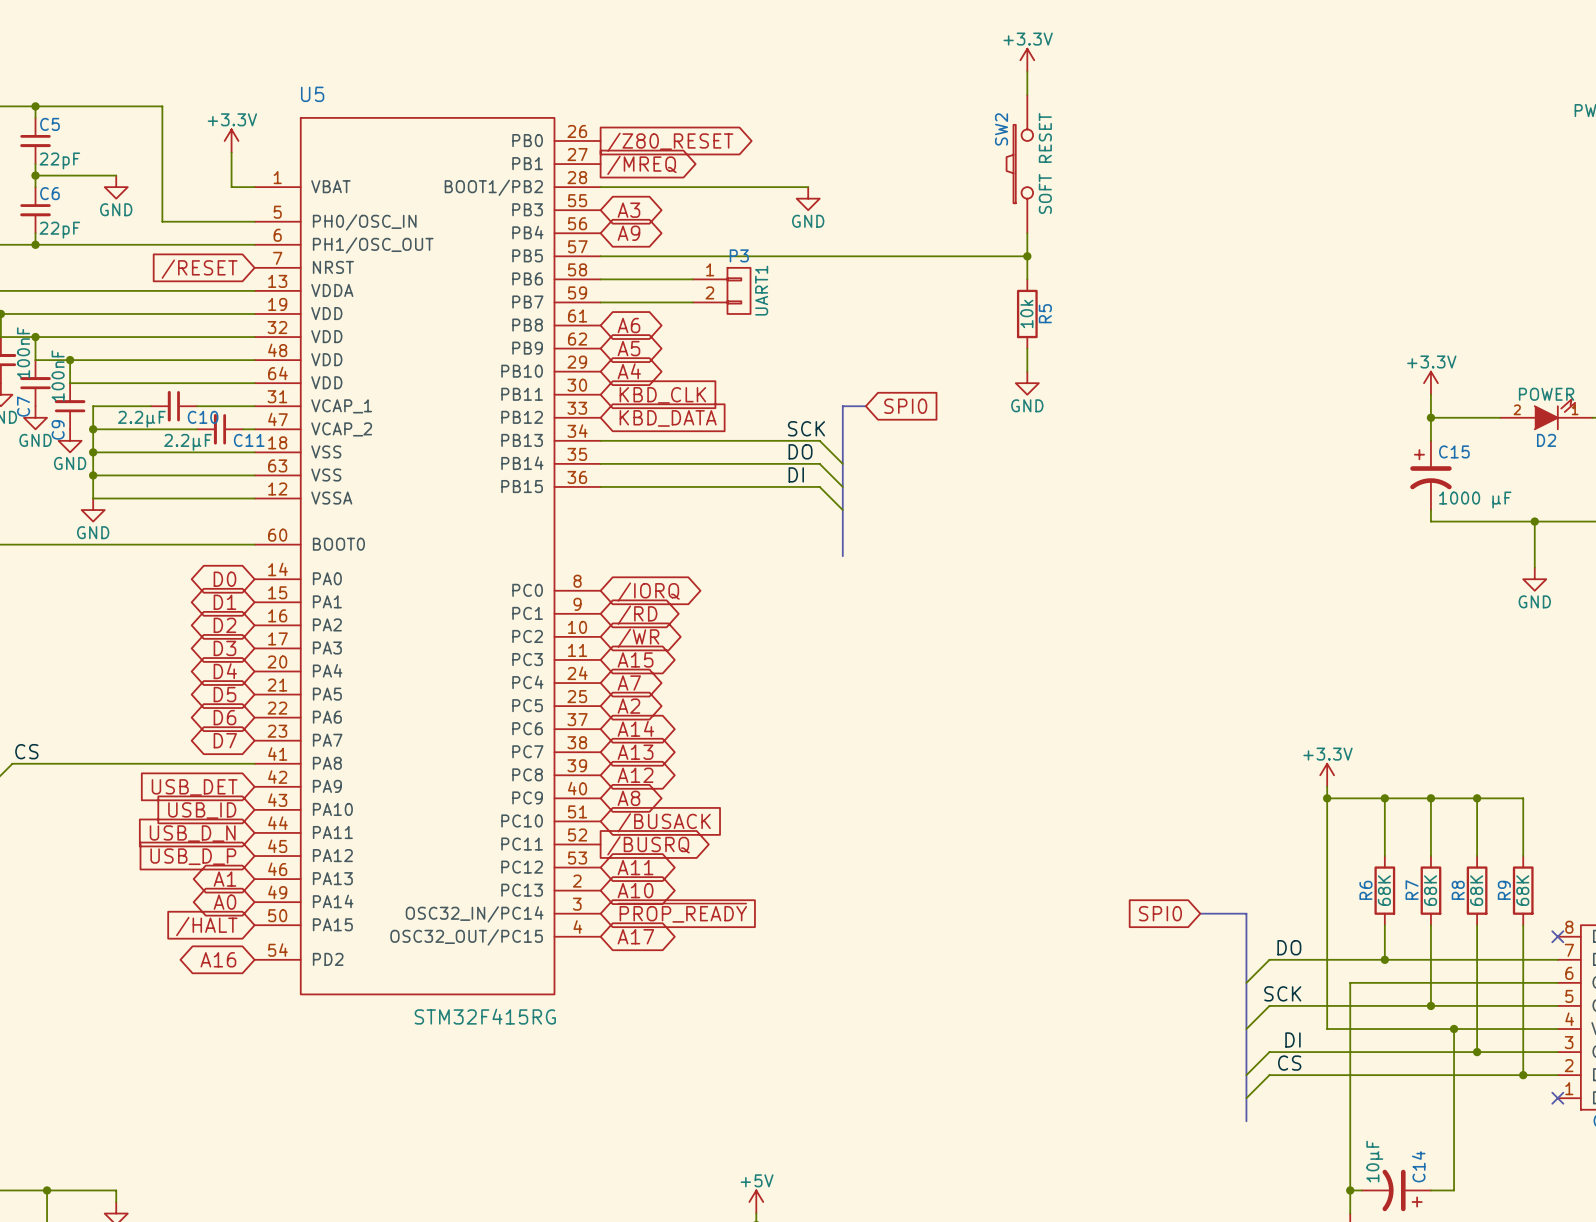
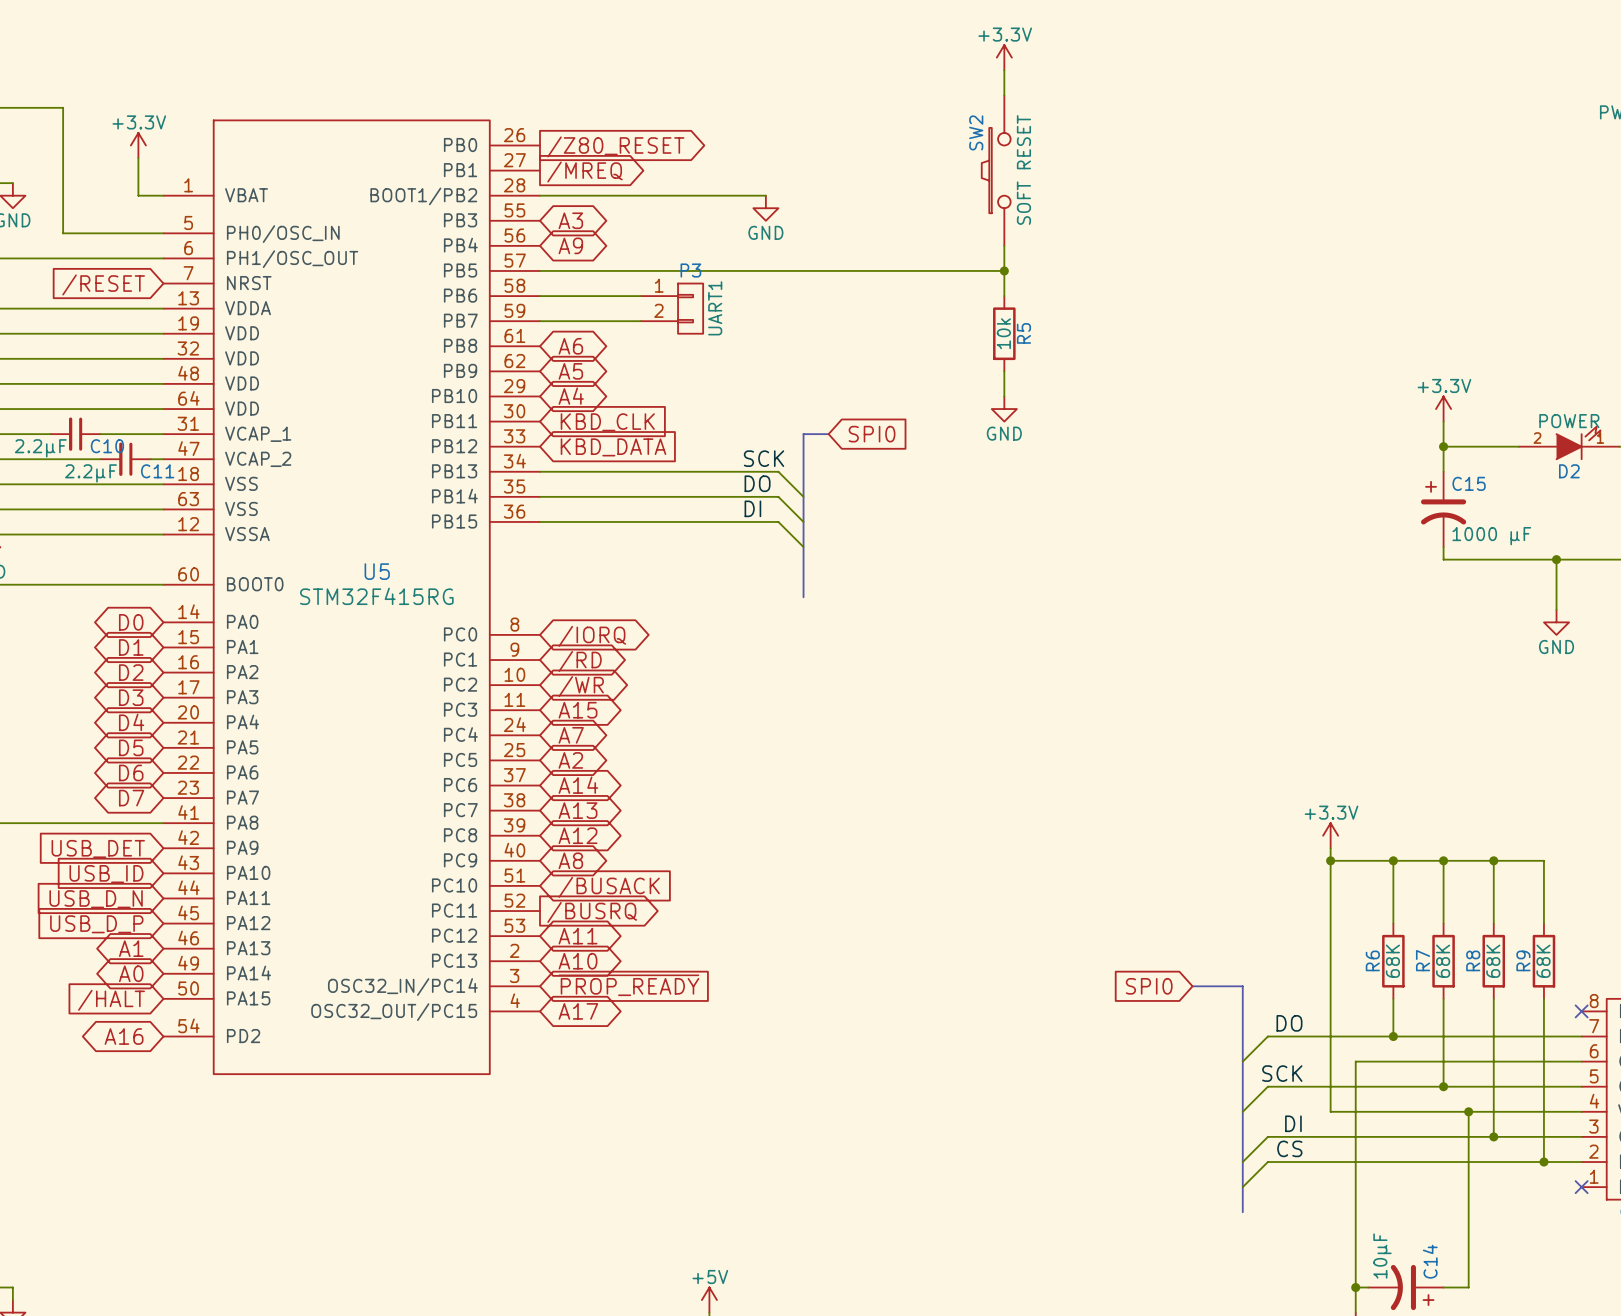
U5 name position: U5 (312, 94) -> U5 (377, 571)
U5 value position: STM32F415RG (485, 1016) -> STM32F415RG (376, 596)

